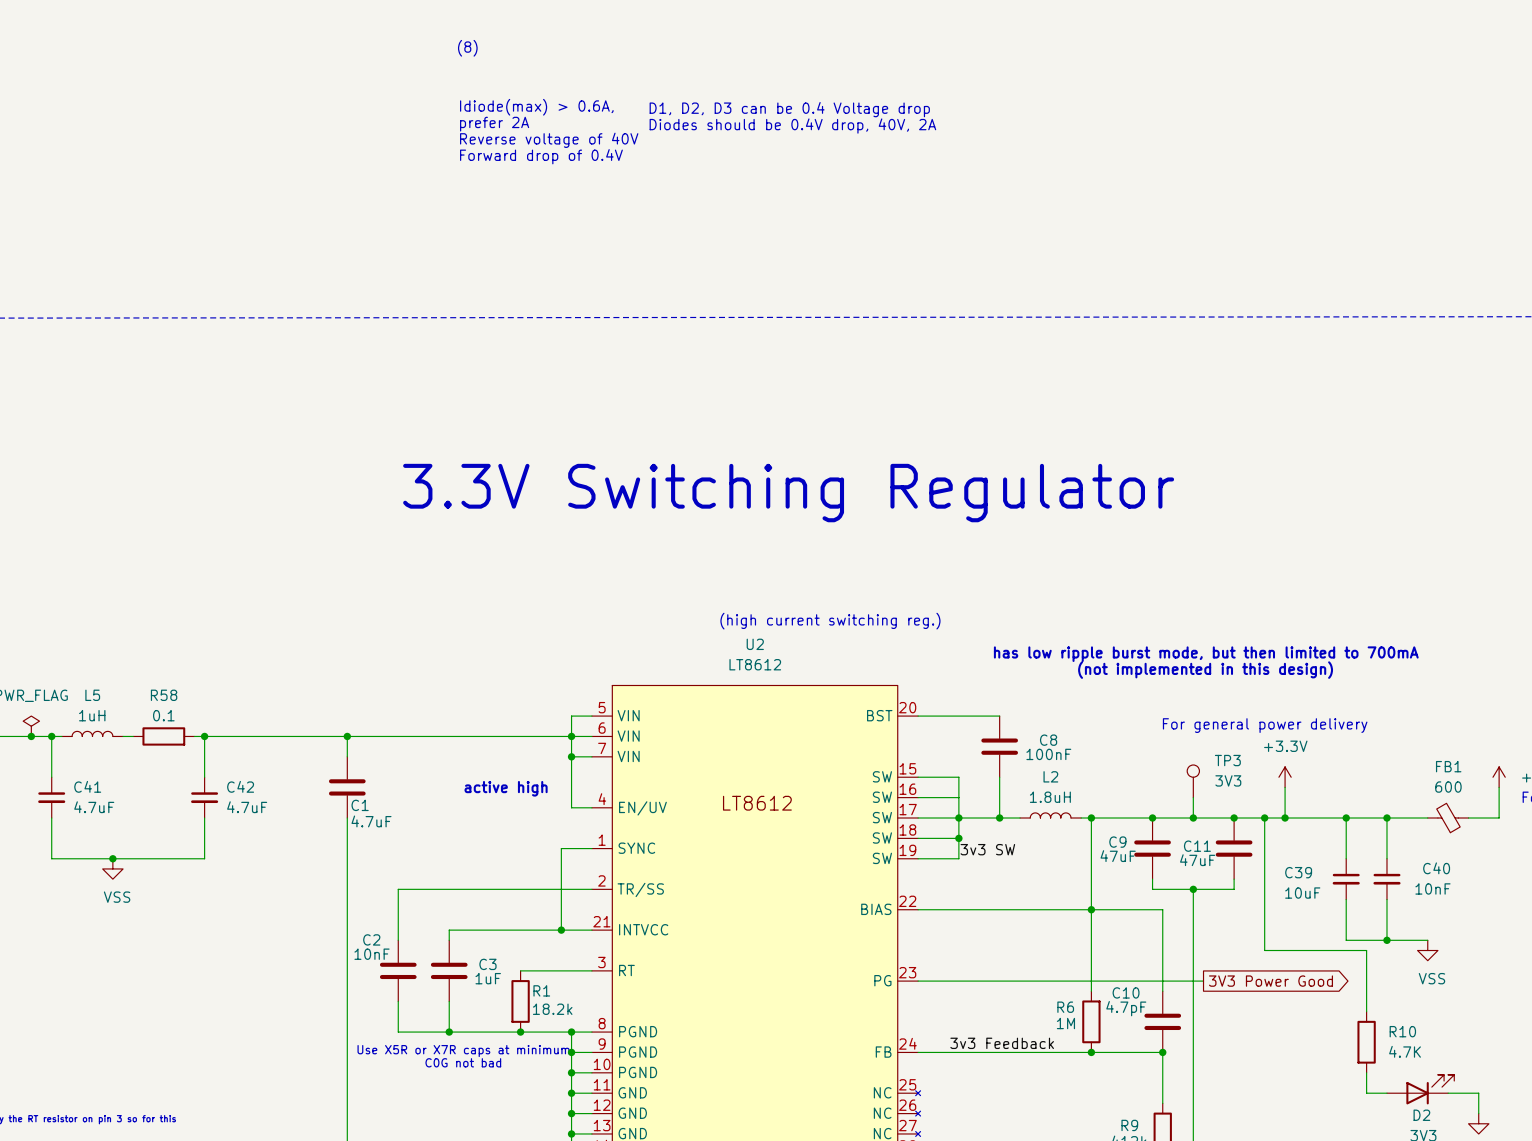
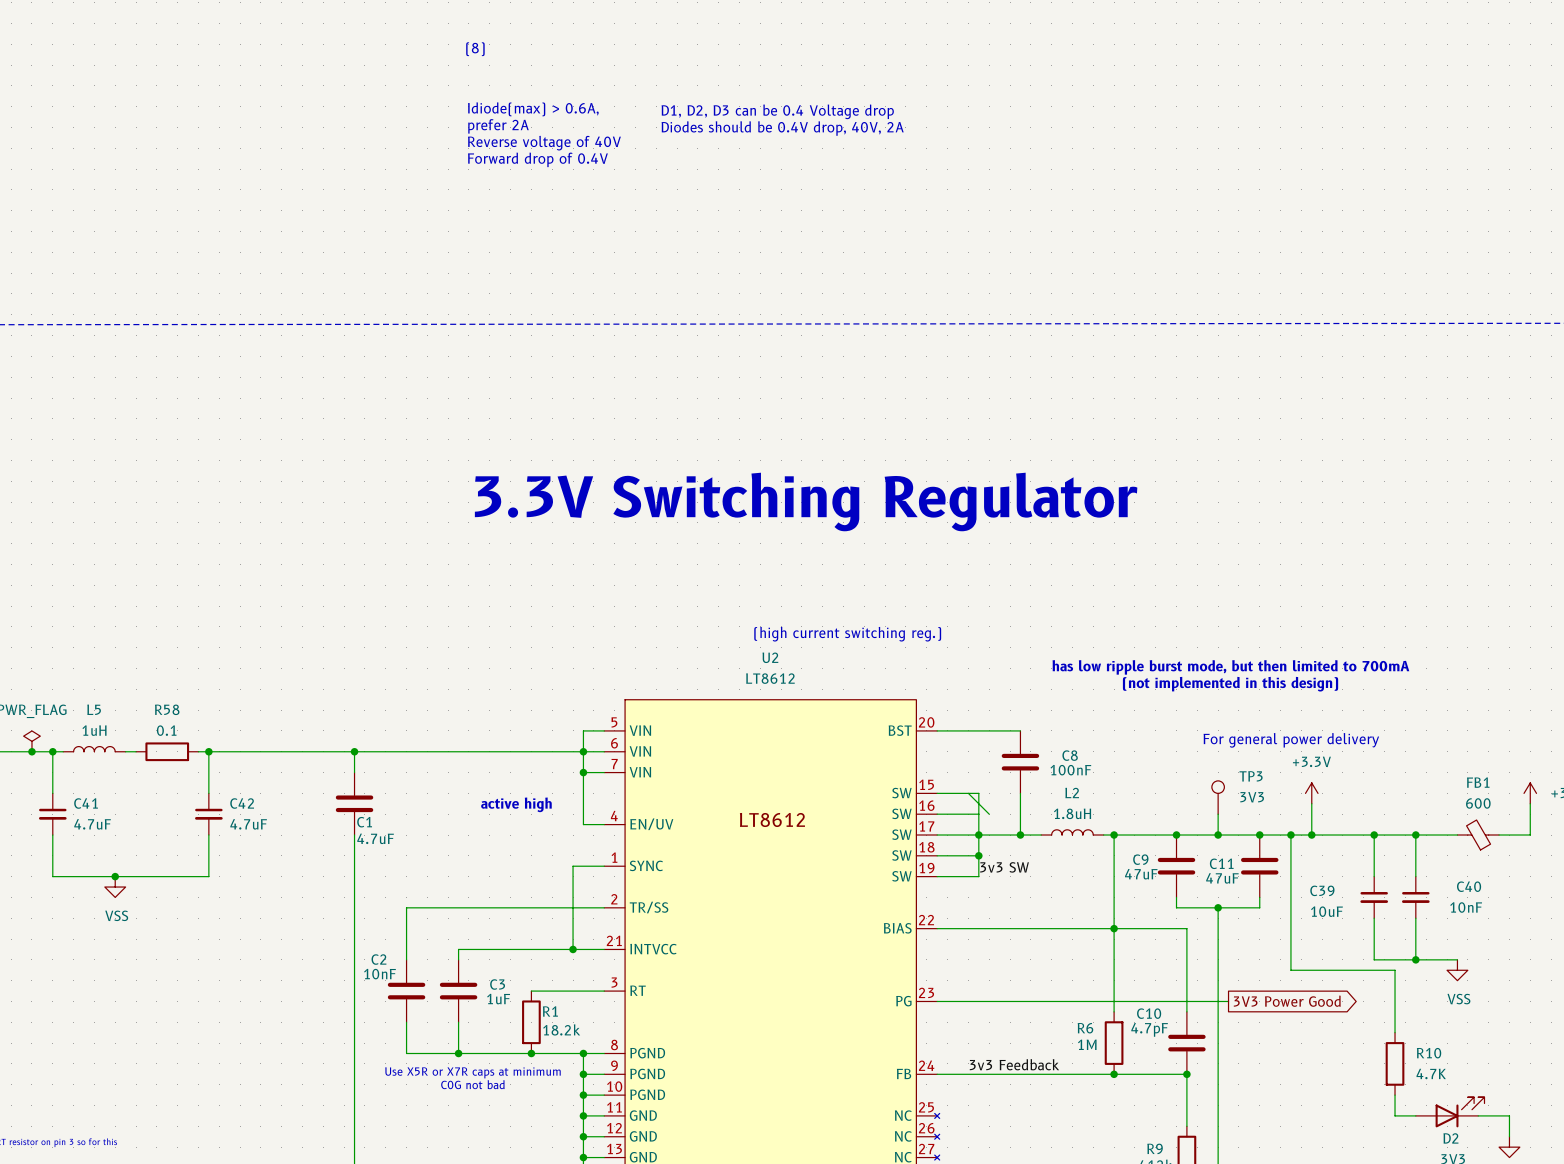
wire: none -> (968, 793) (989, 814)

